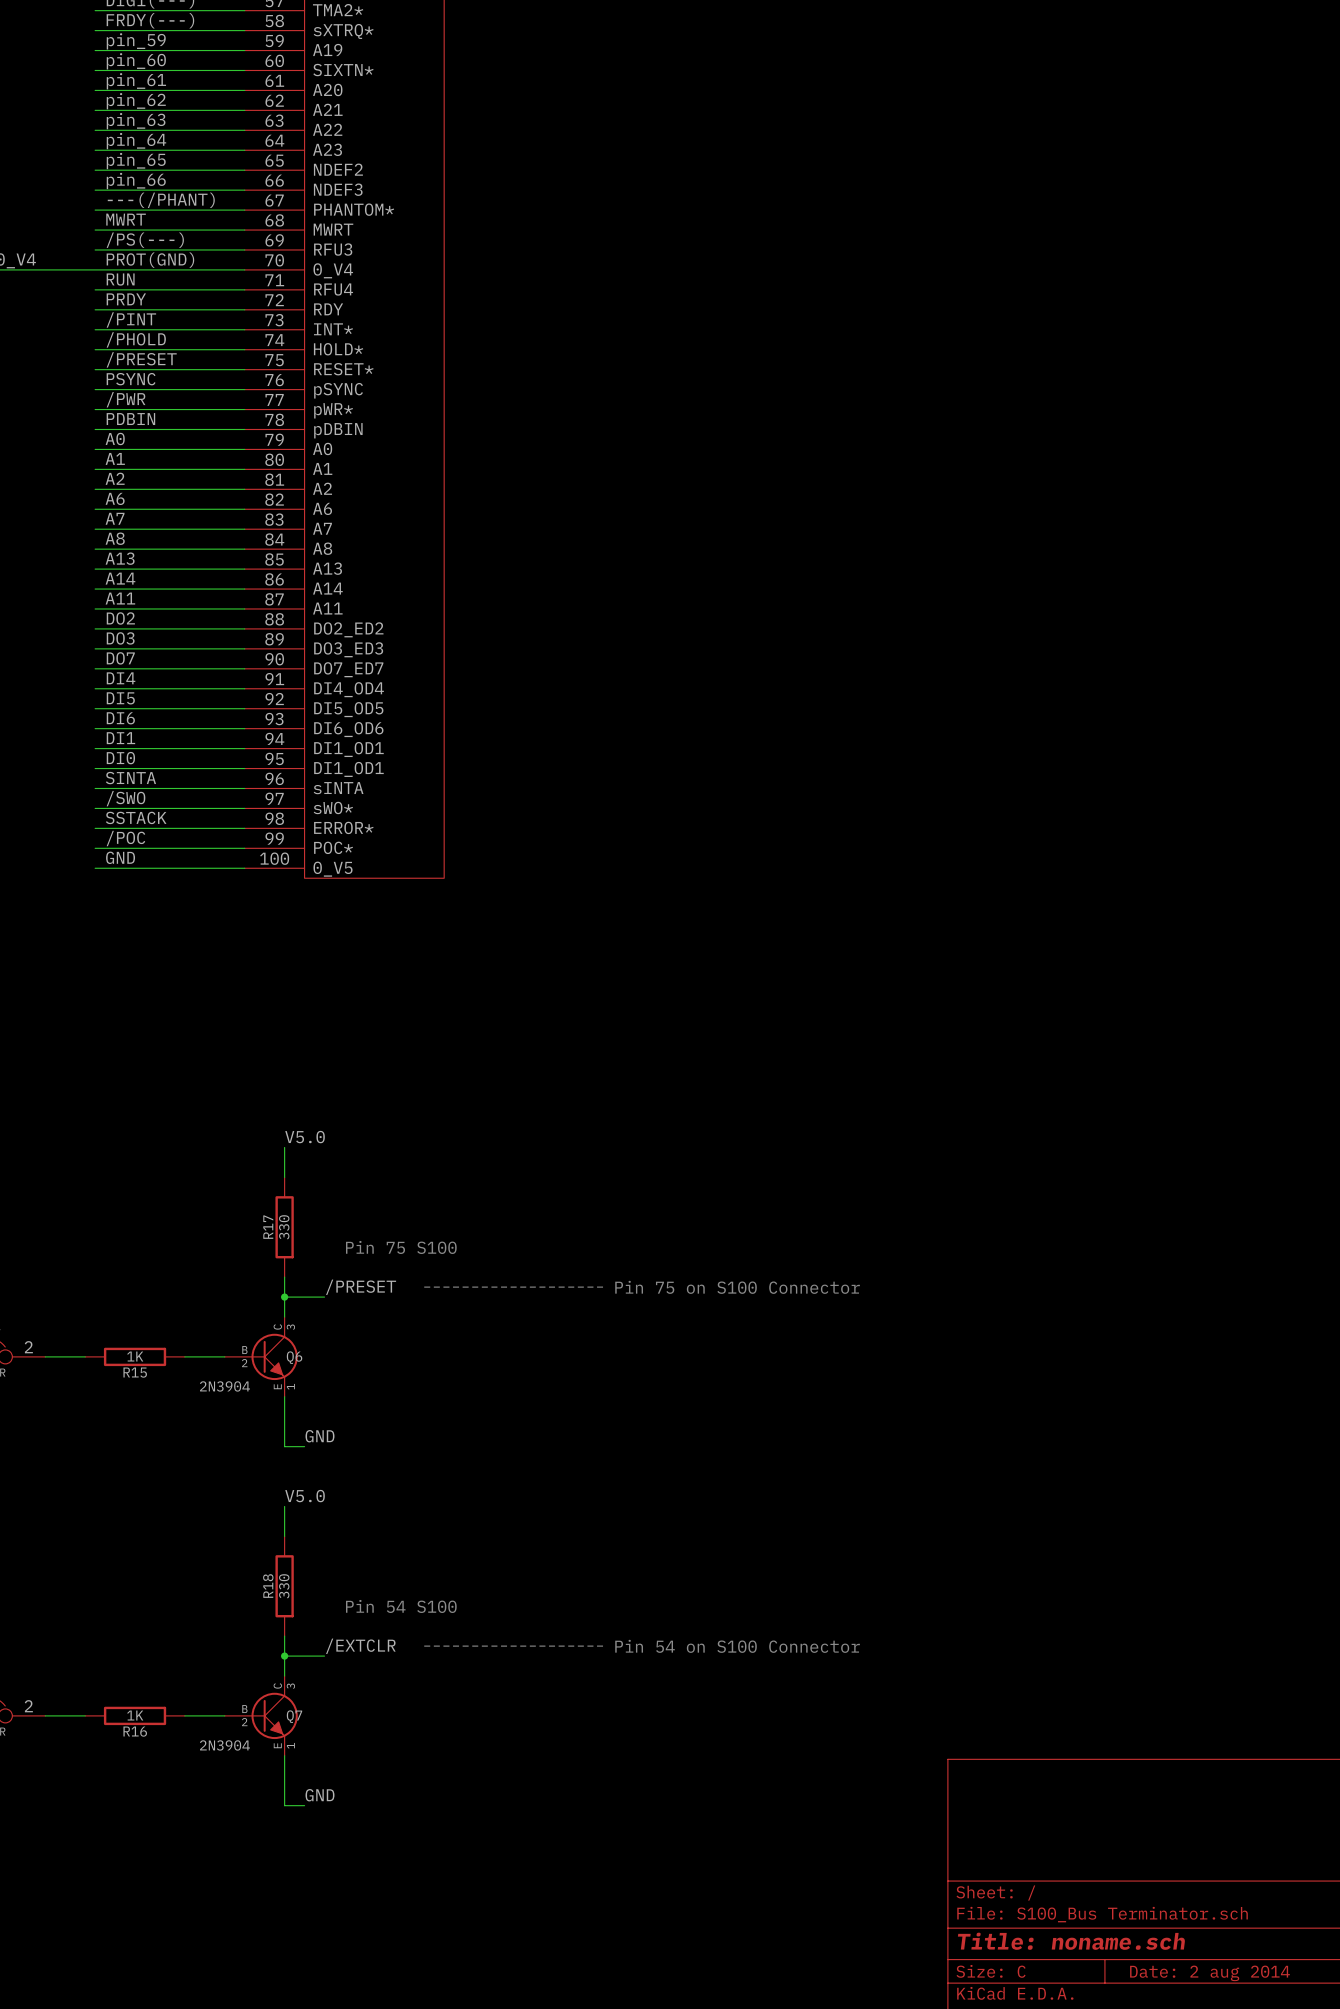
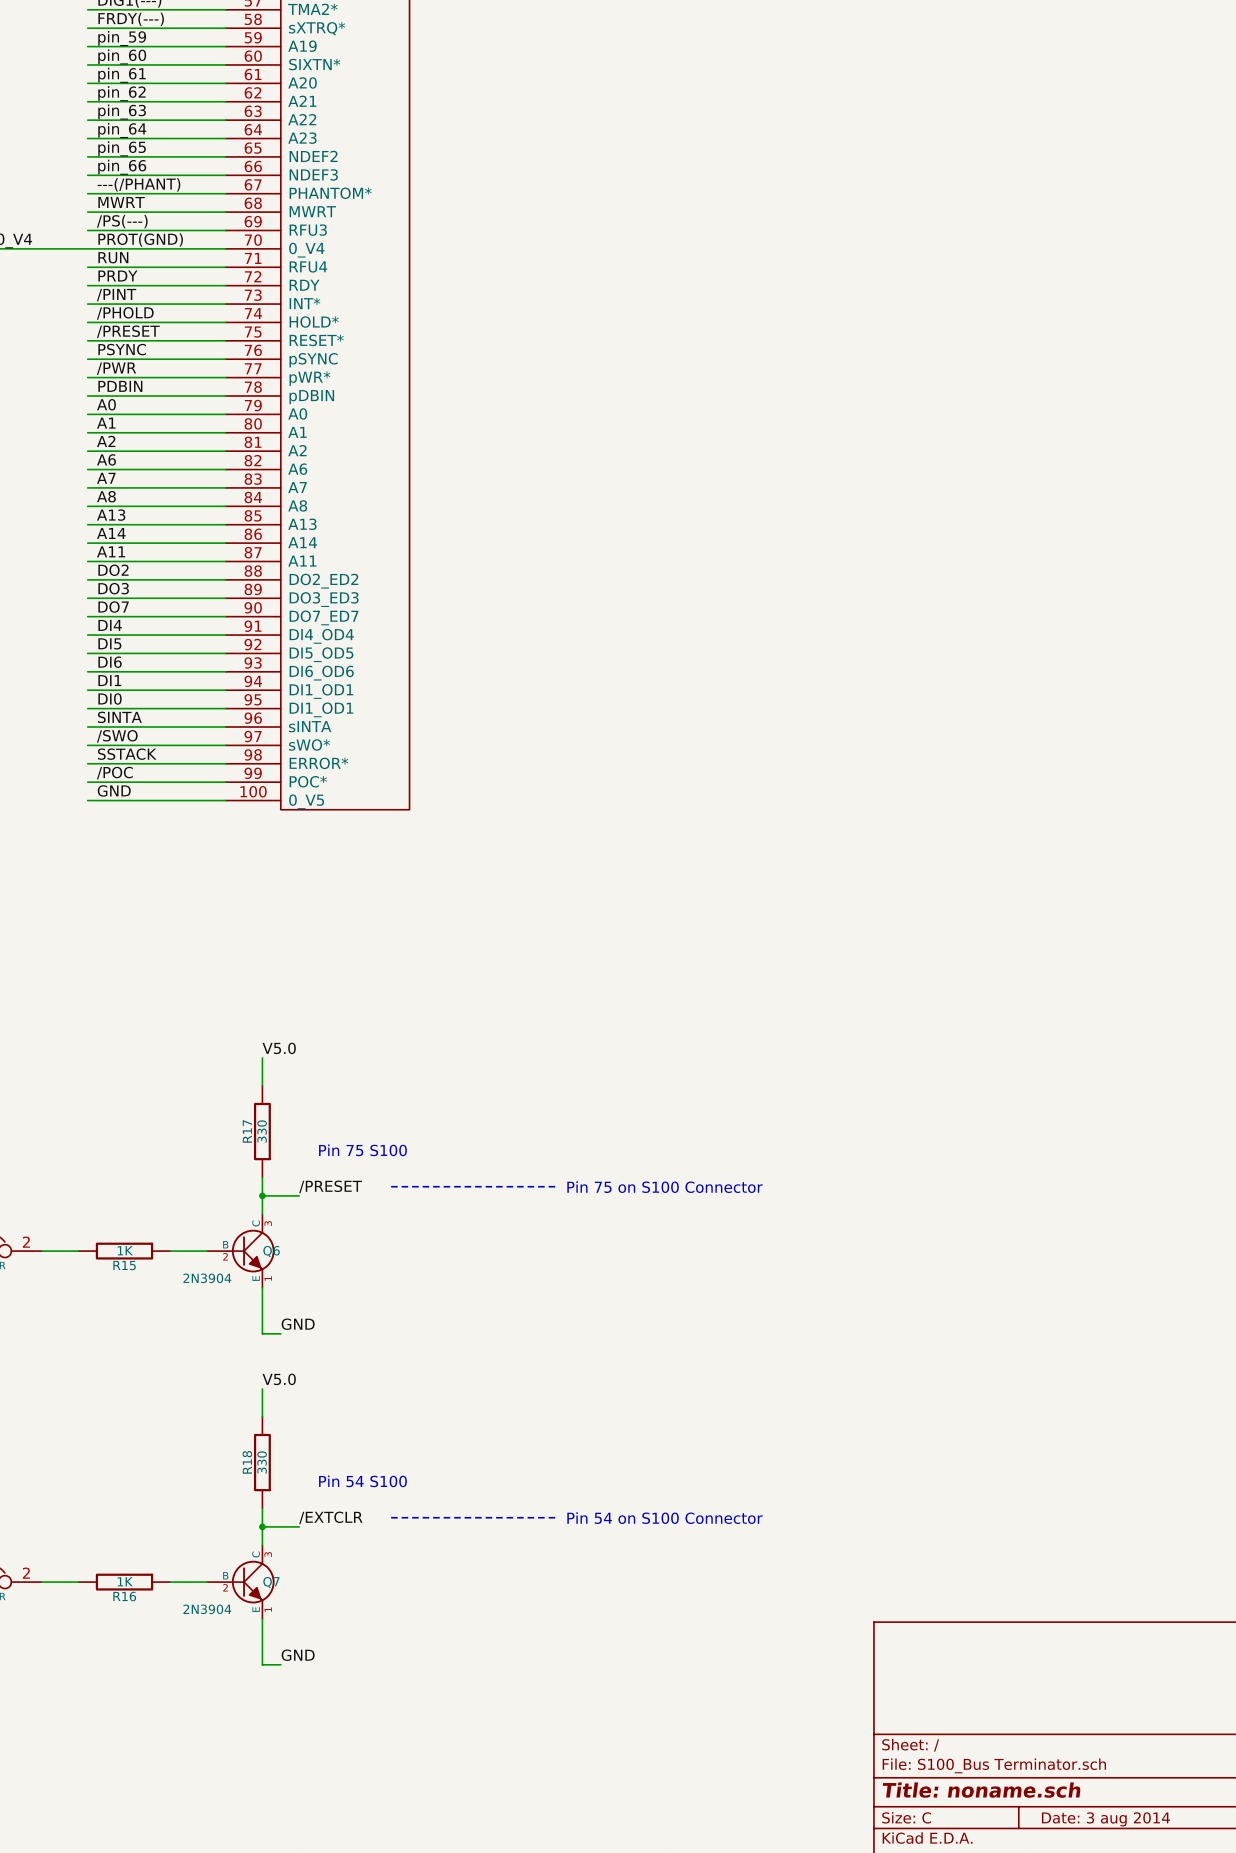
title block: Date: 2 aug 2014 (1209, 1973) -> Date: 3 aug 2014 (1105, 1819)

